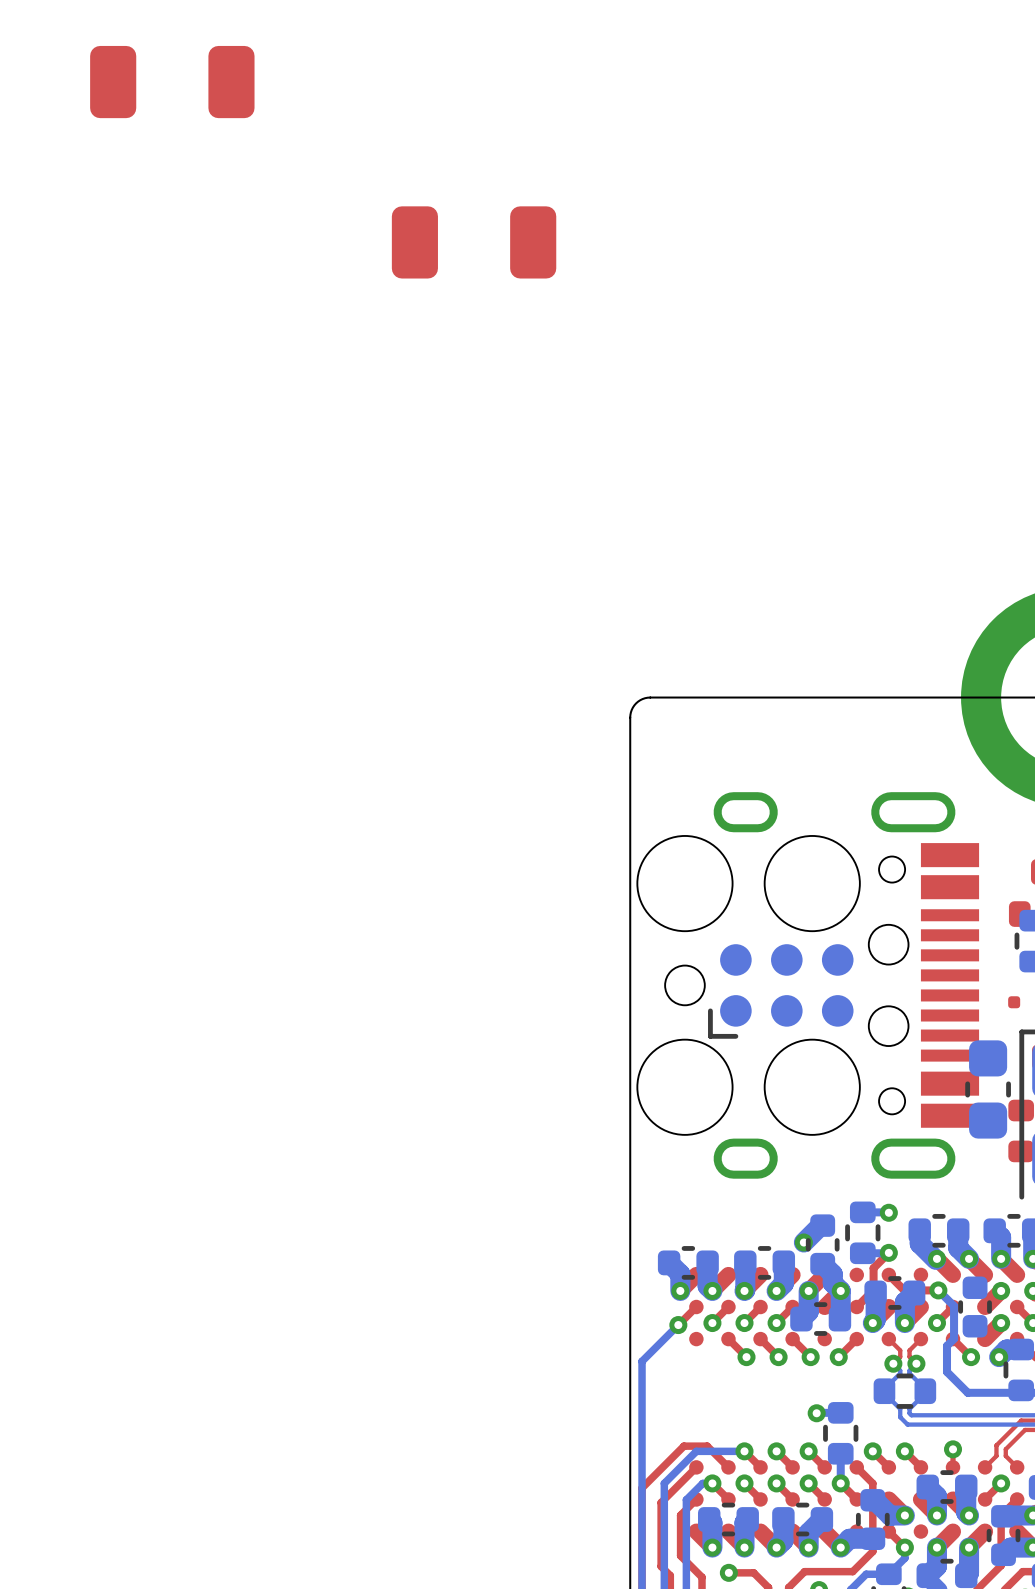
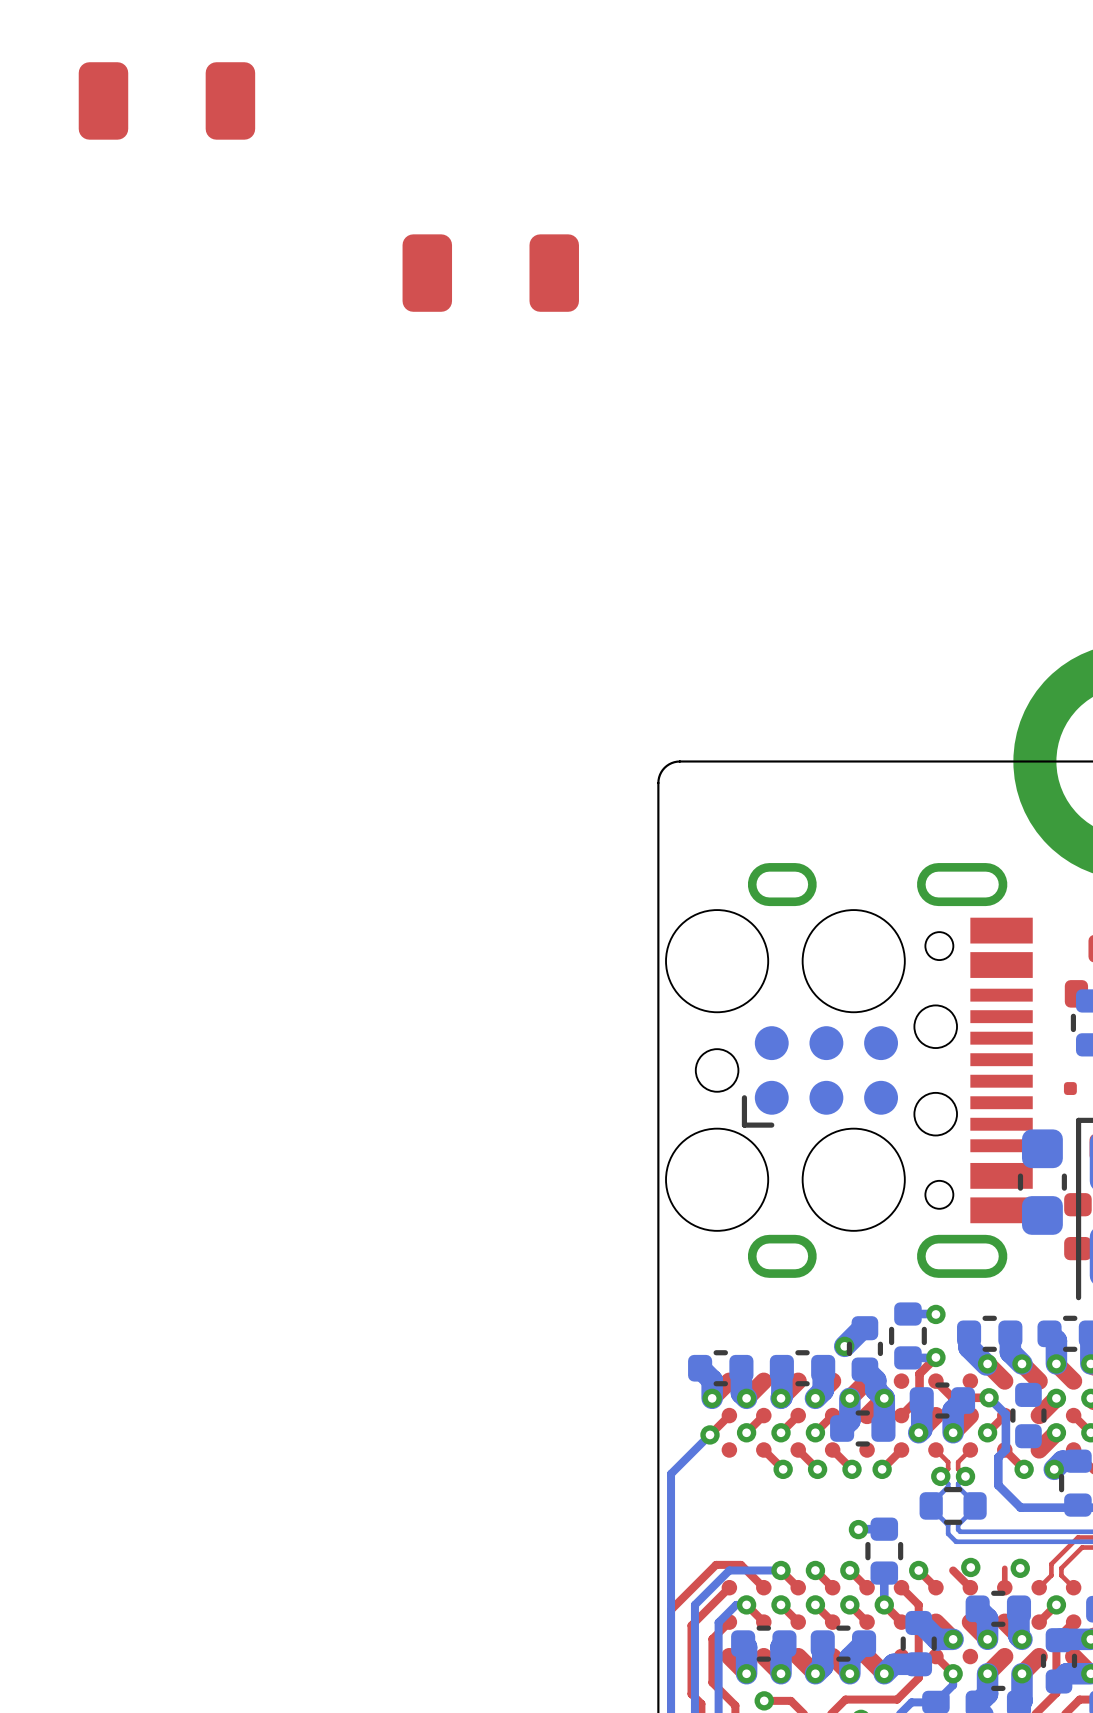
via position: (953, 1449) -> (1020, 1568)
via position: (904, 1451) -> (970, 1567)

